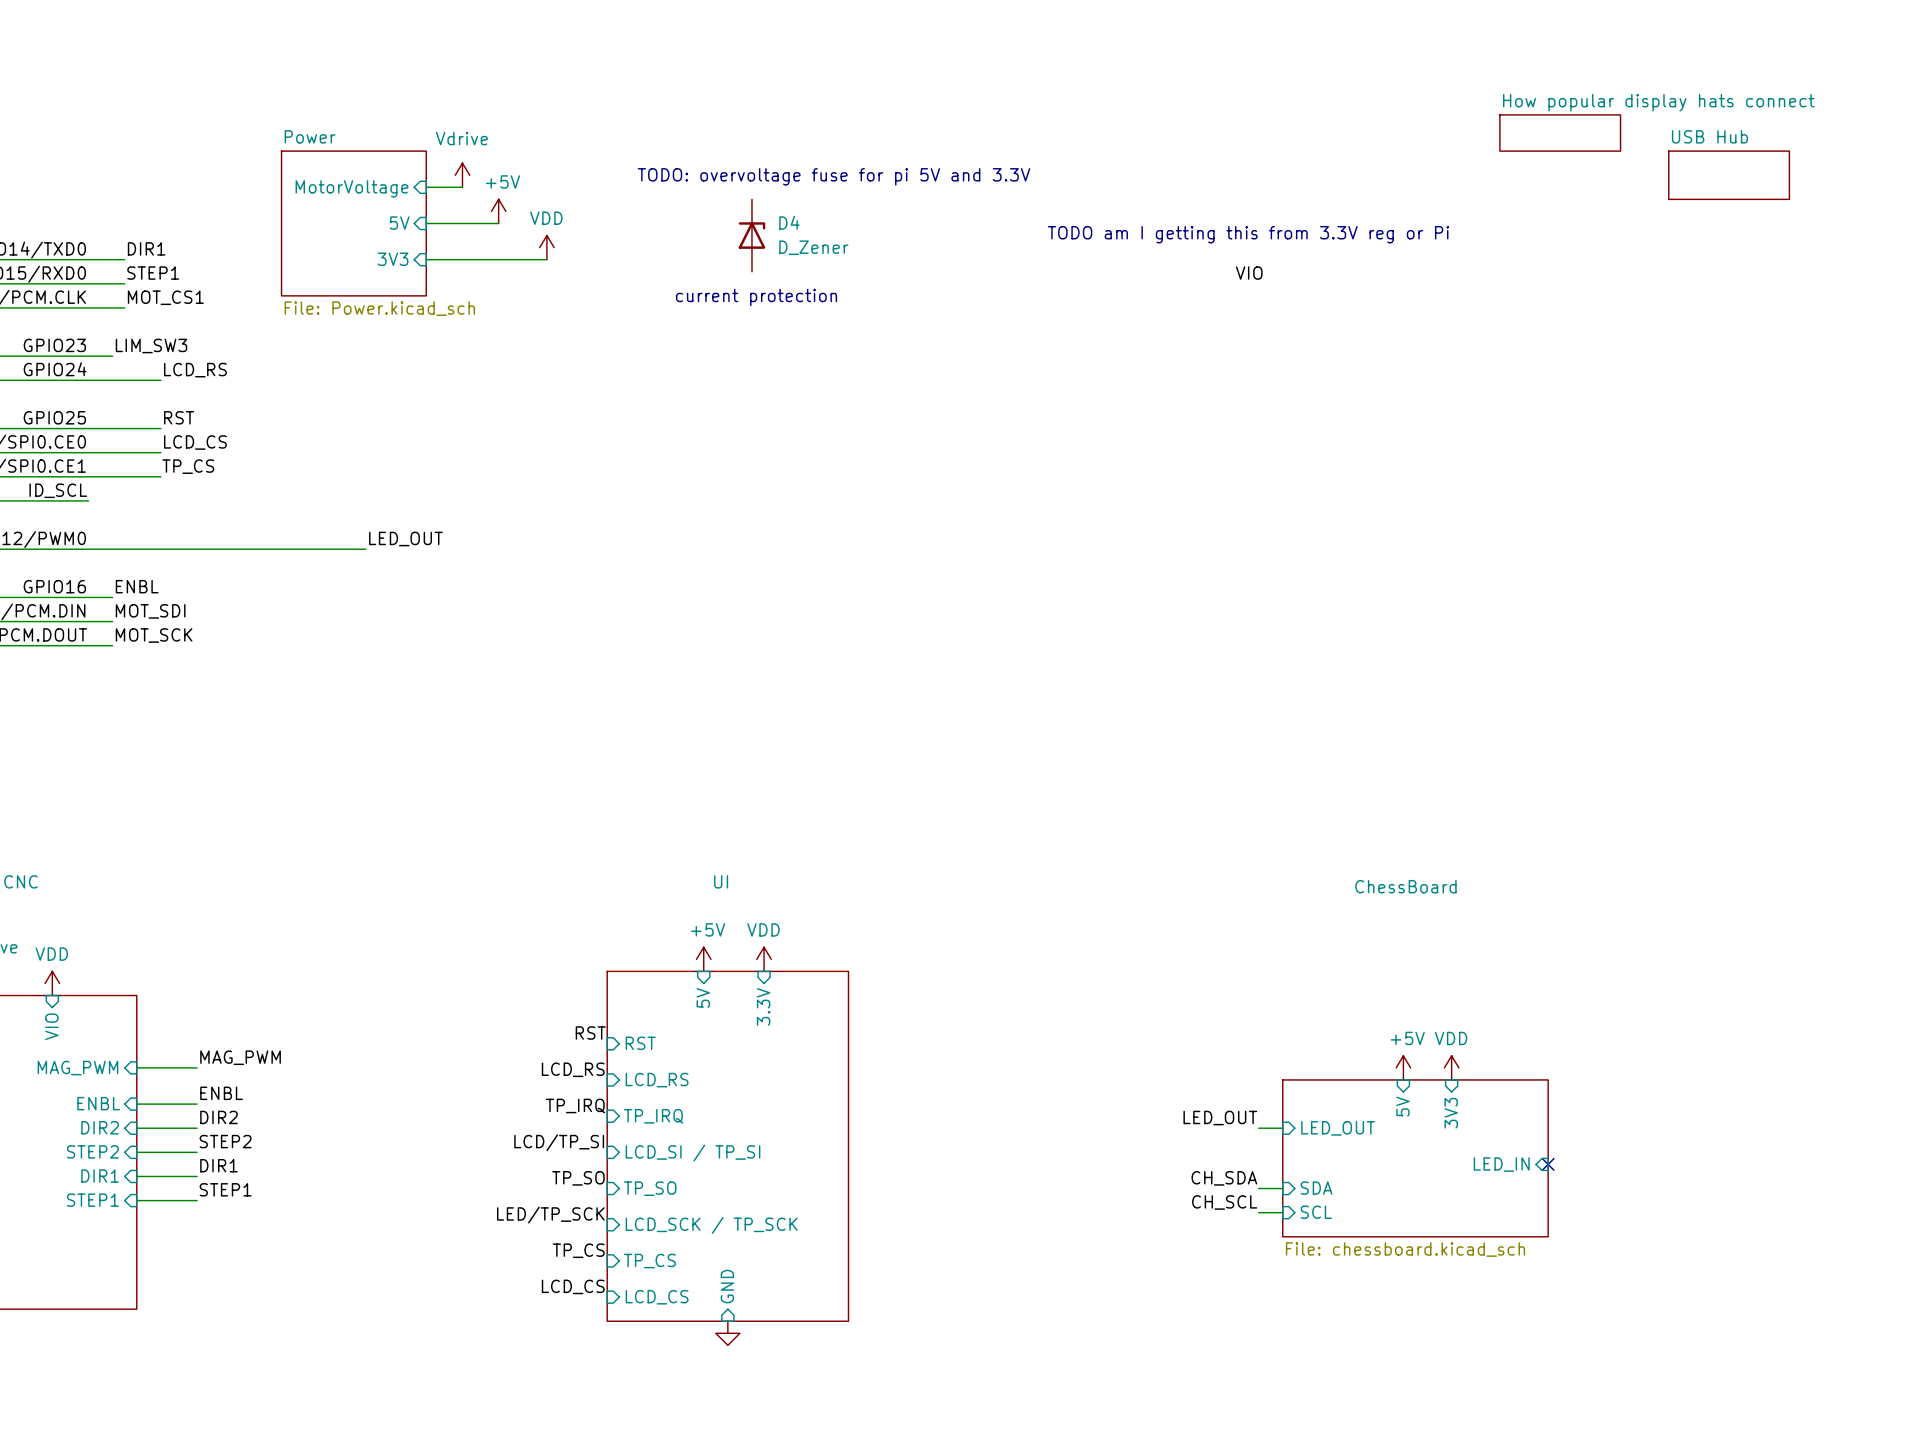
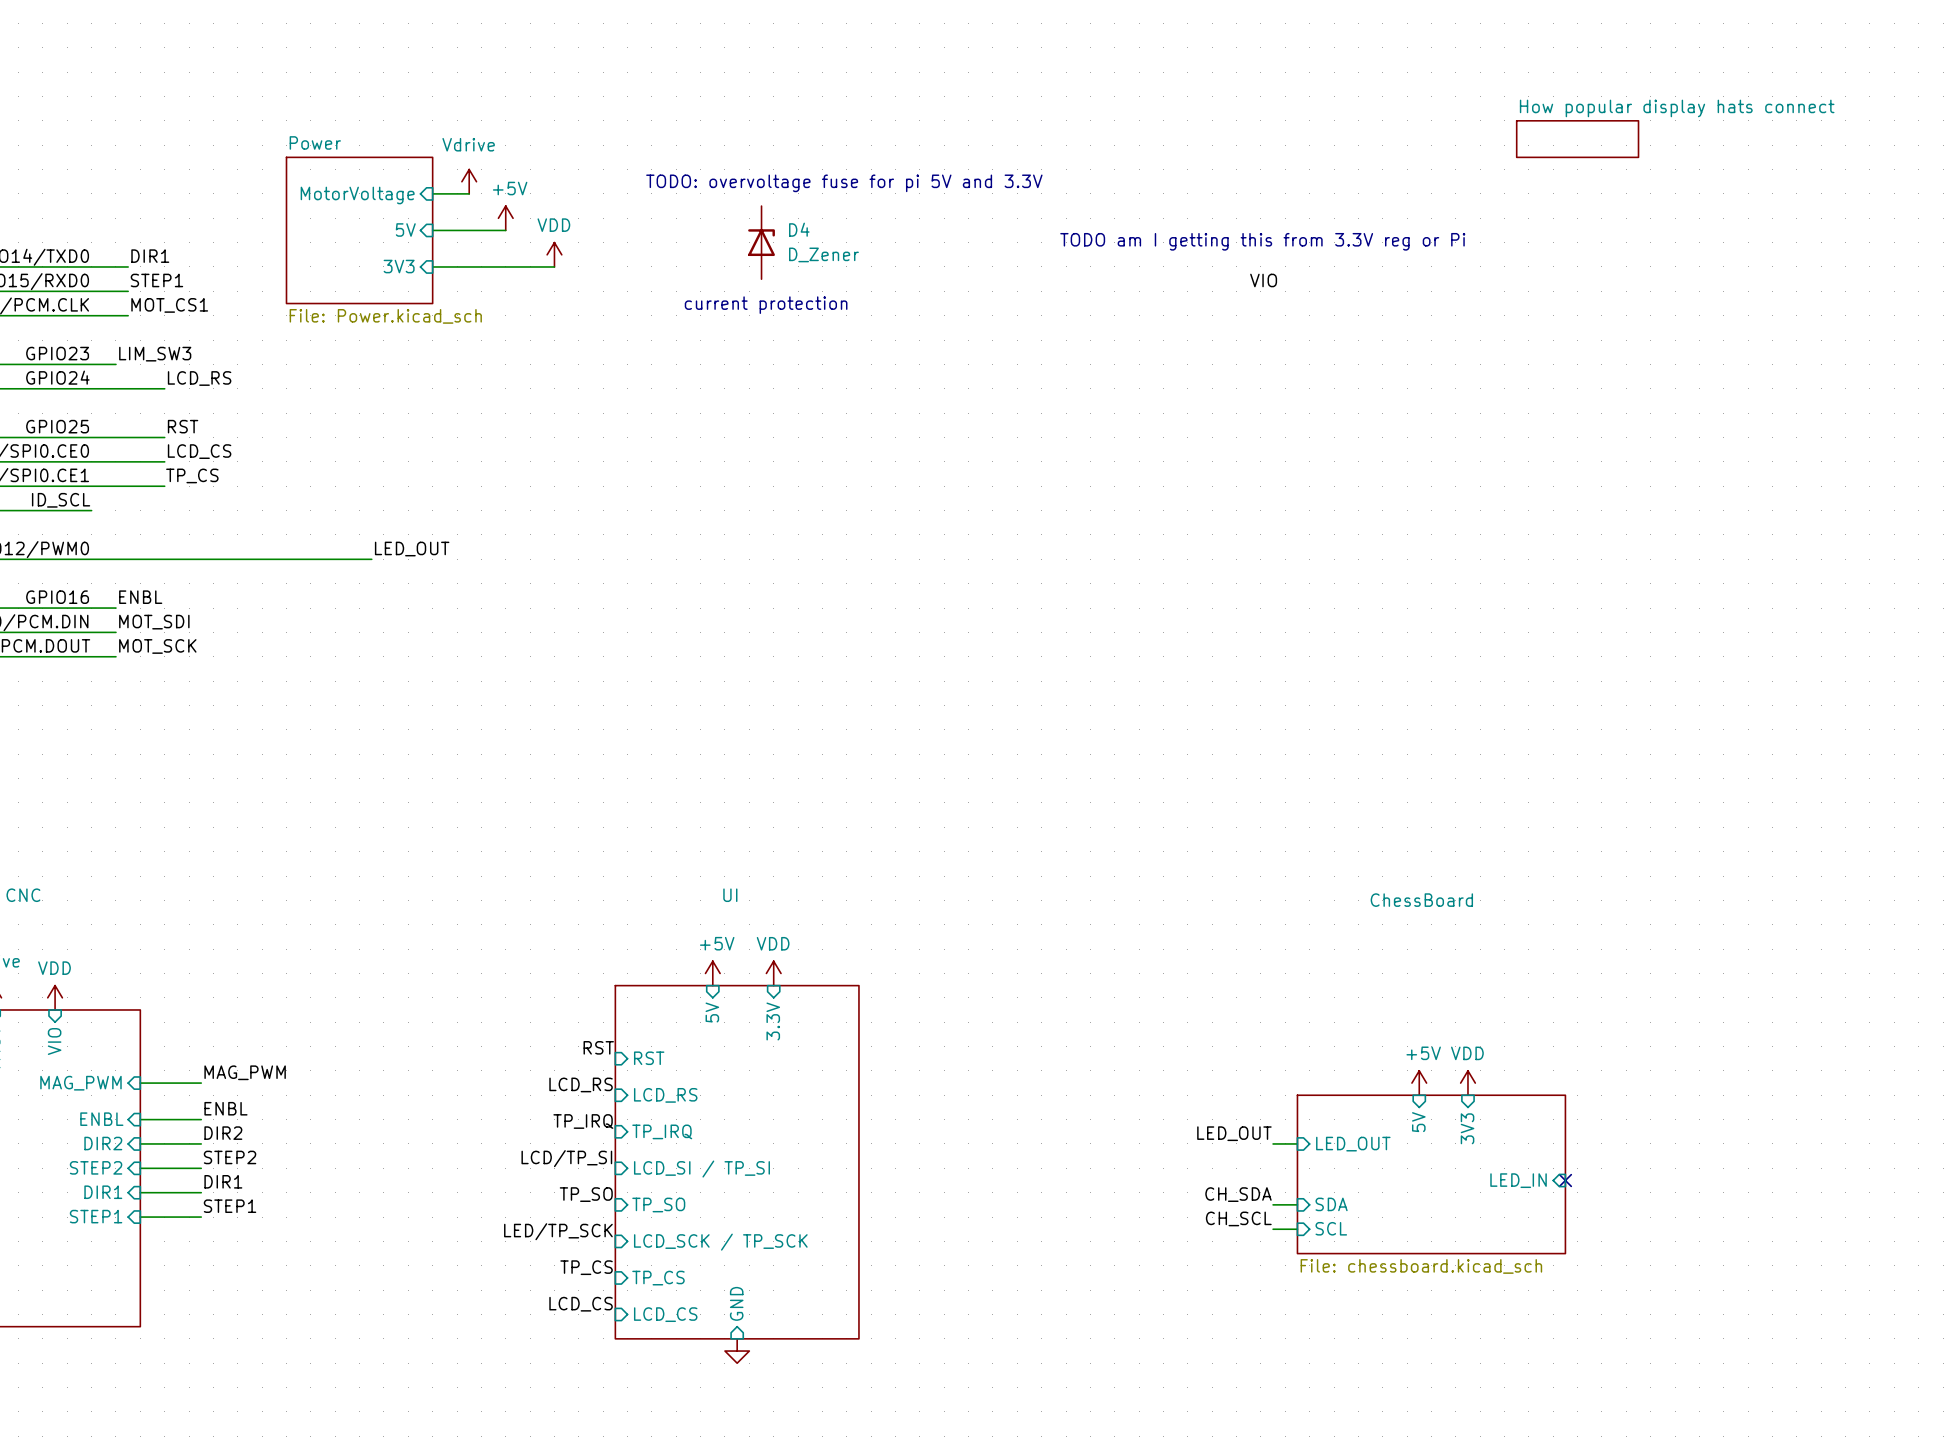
sheet USB Hub: (1729, 175) -> none

